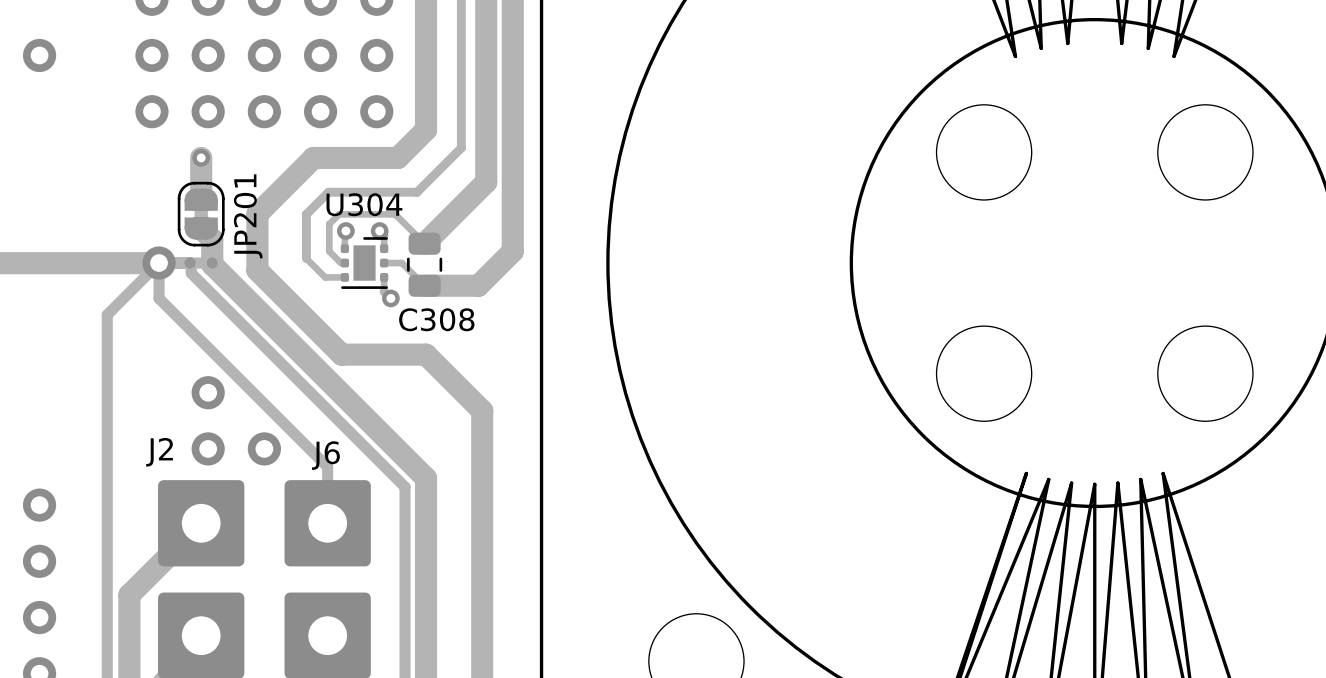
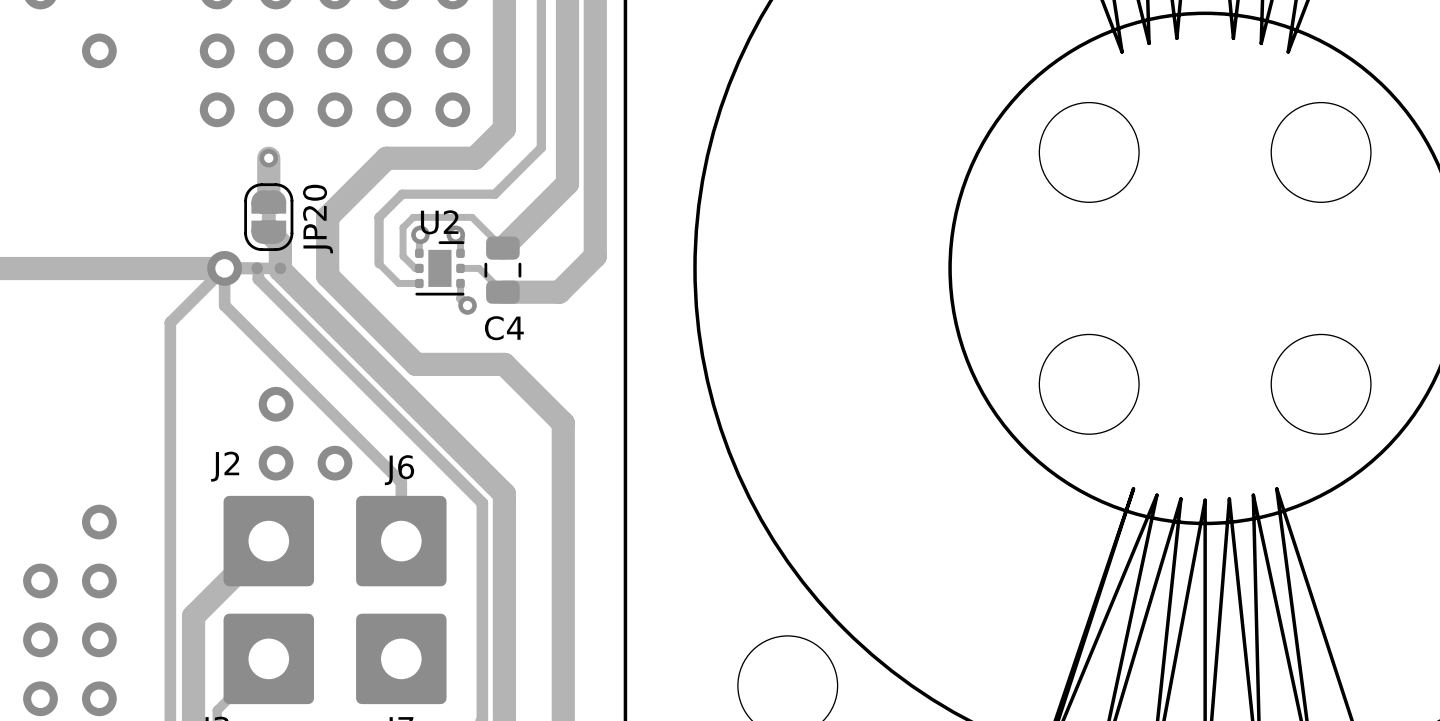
U304 name: U304 (364, 204) -> U2 (439, 222)
JP201 name: JP201 (248, 216) -> JP20 (318, 219)
C308 name: C308 (436, 319) -> C4 (504, 328)

